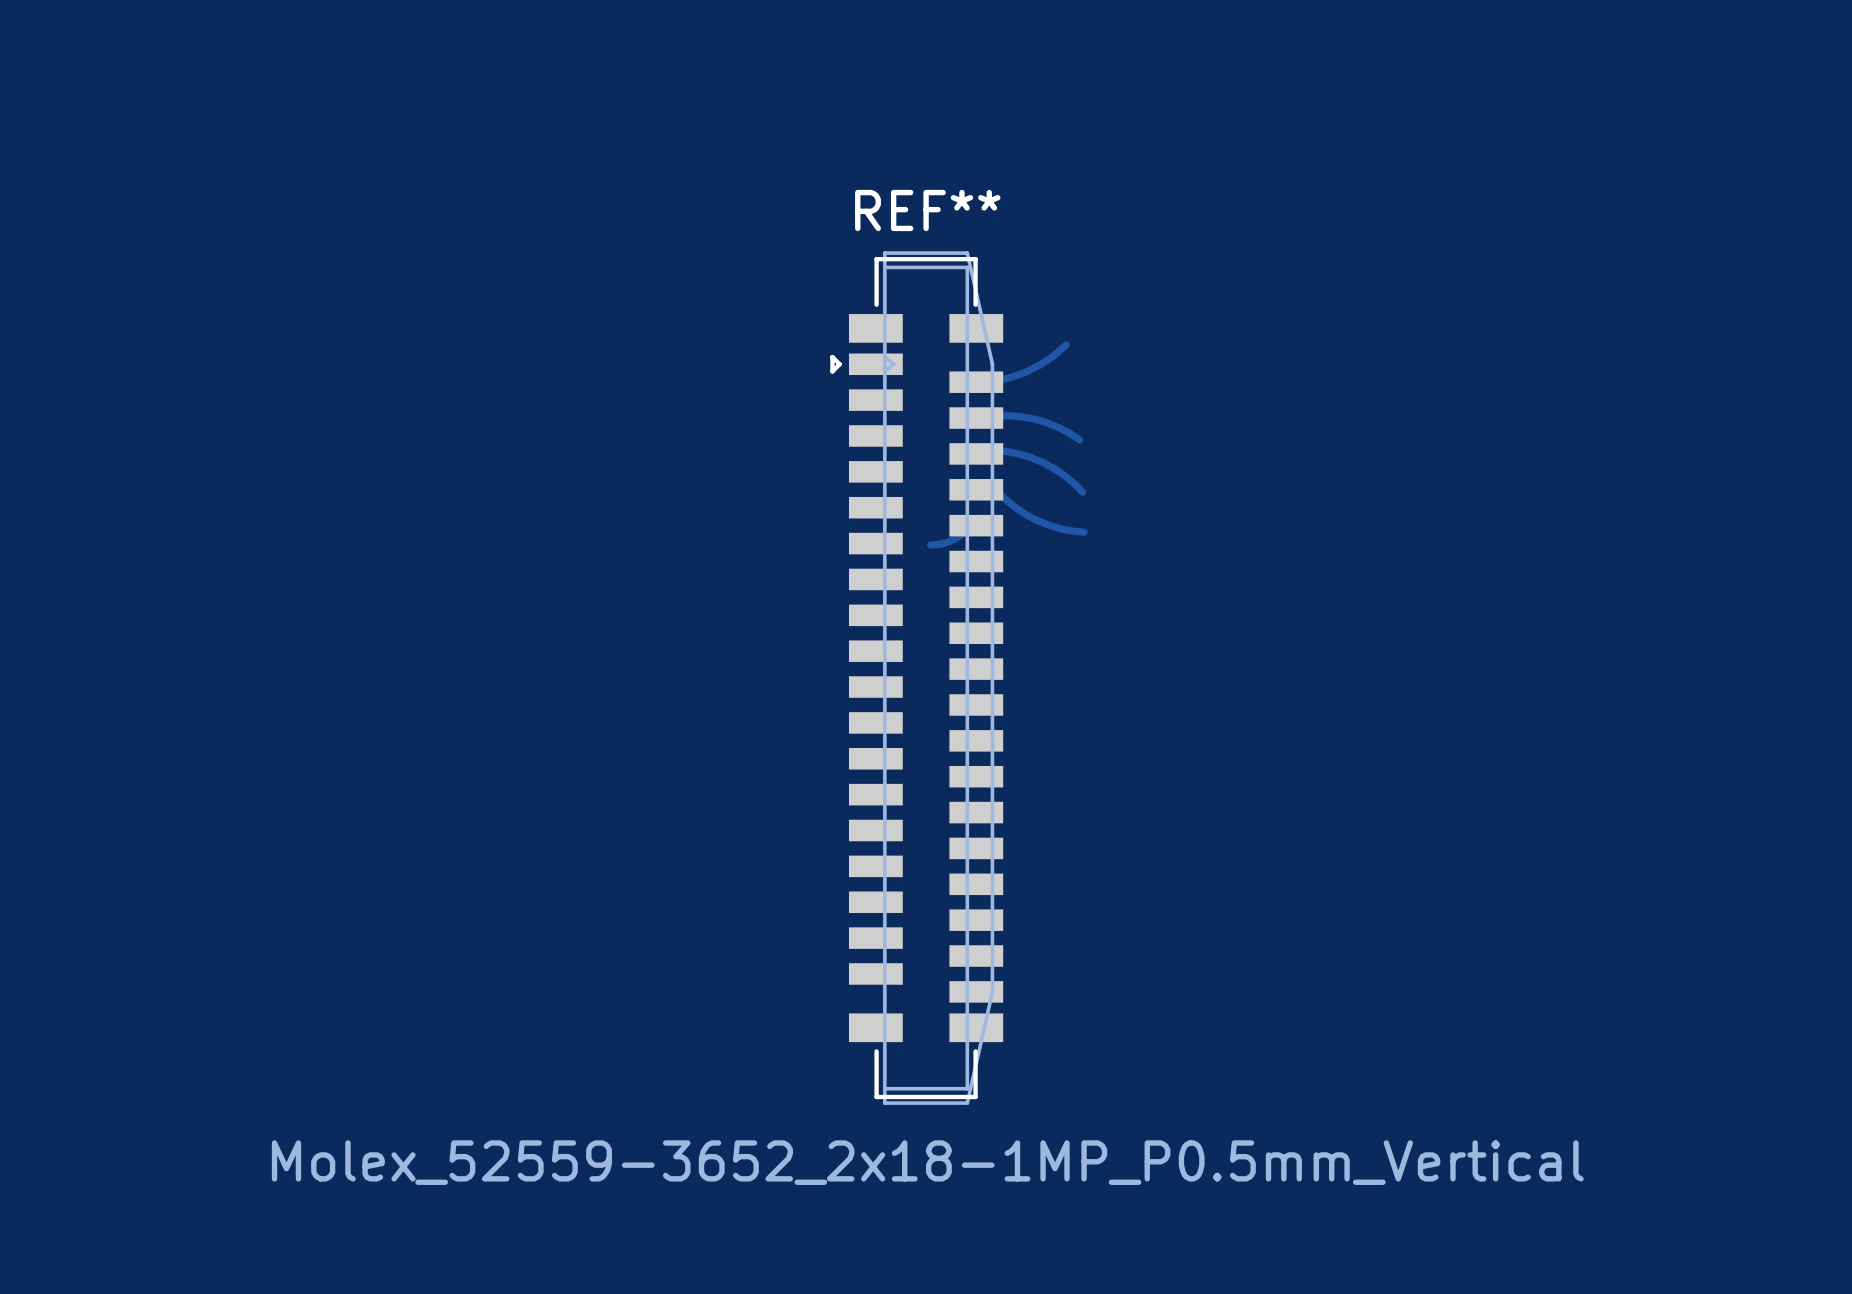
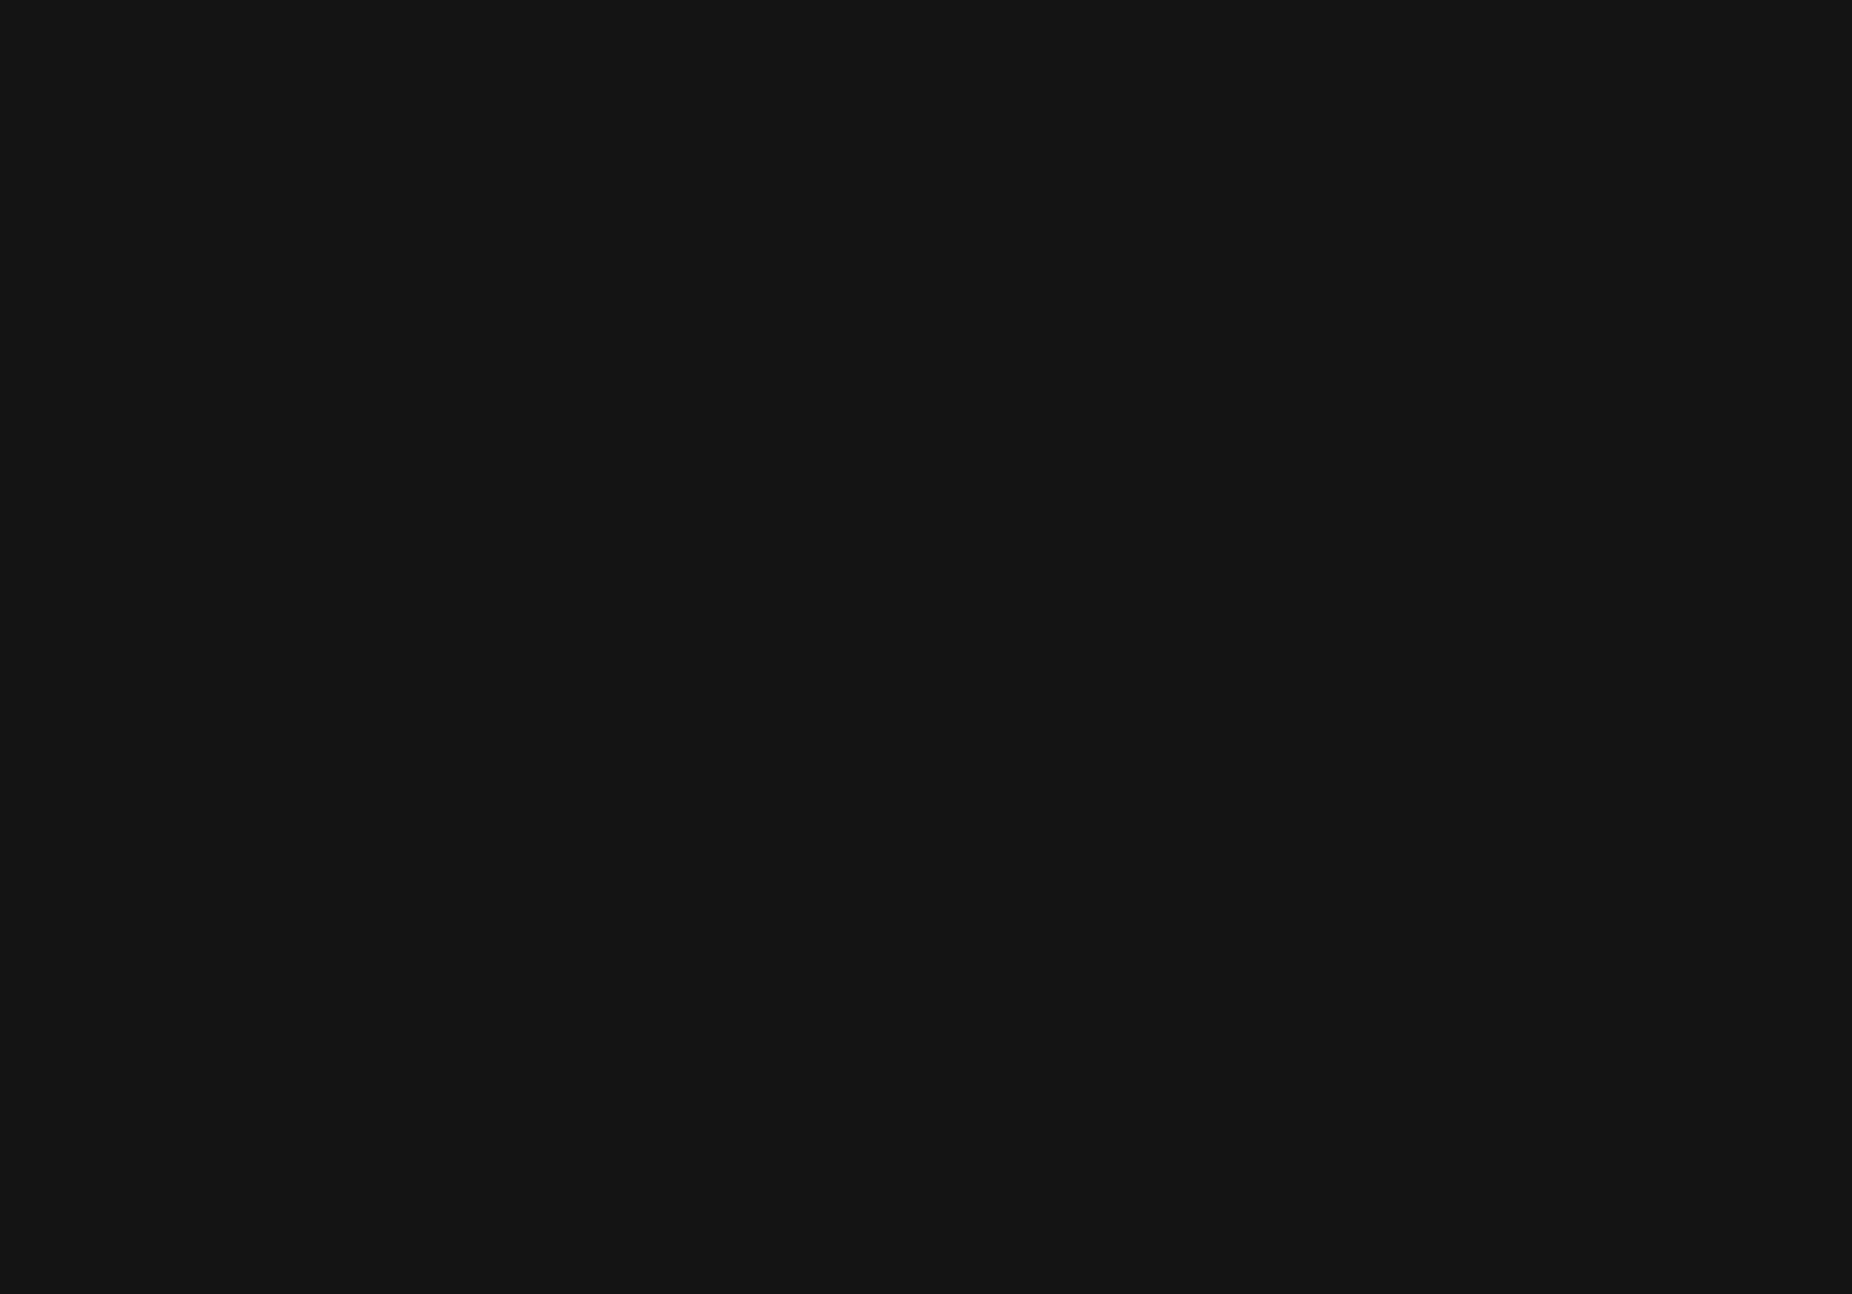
track: (1066, 345) (1039, 365) (1024, 372) (992, 381) (976, 382) -> none
track: (985, 417) (1010, 415) (1034, 419) (1058, 427) (1079, 439) -> none
track: (995, 450) (1019, 454) (1043, 462) (1064, 475) (1082, 492) -> none
track: (996, 490) (1014, 507) (1036, 520) (1059, 528) (1084, 532) -> none
track: (966, 530) (950, 541) (930, 545) -> none
REF**: Molex_52559-3652_2x18-1MP_P0.5mm_Vertical (916, 678) -> none

